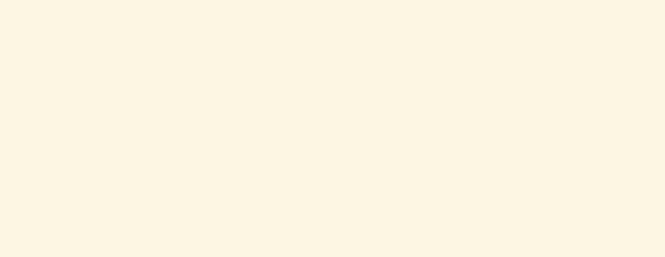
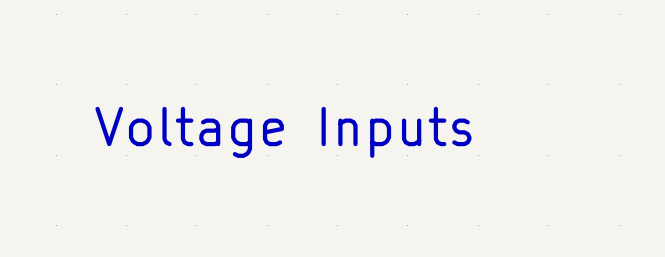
text: none -> Voltage Inputs (283, 132)

